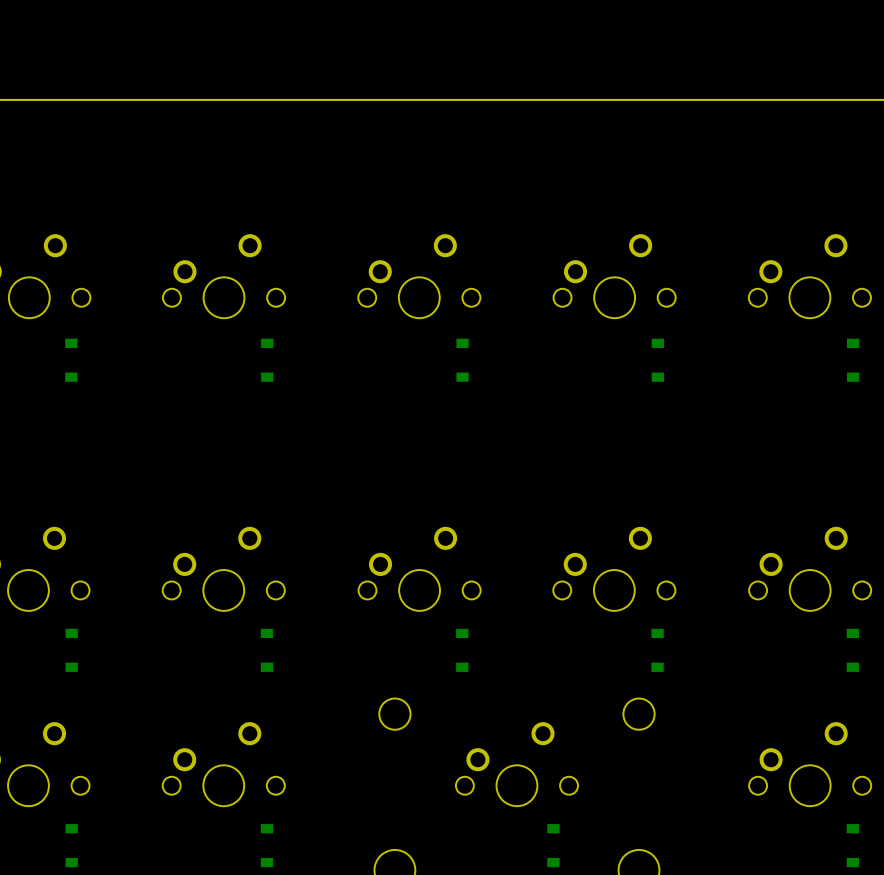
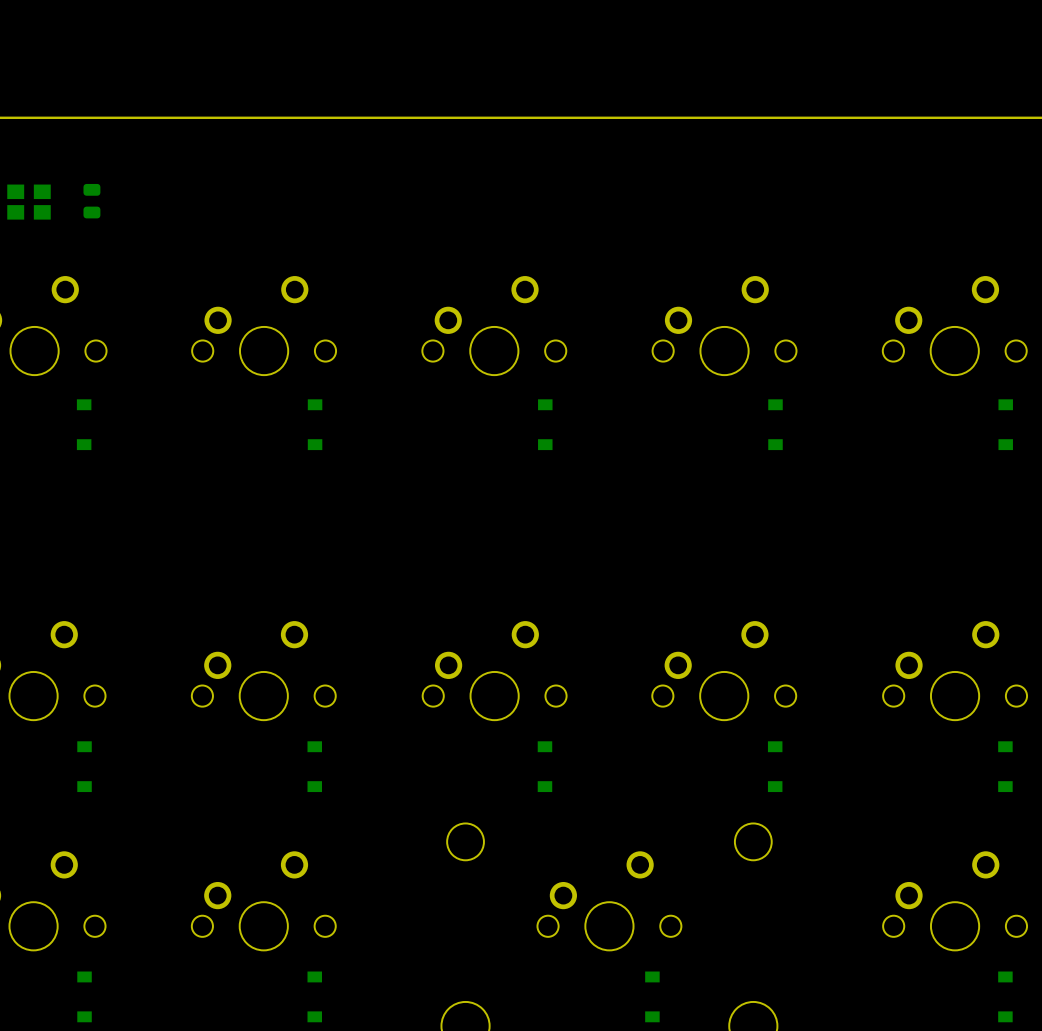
part: none -> (91, 201)
part: none -> (29, 202)

